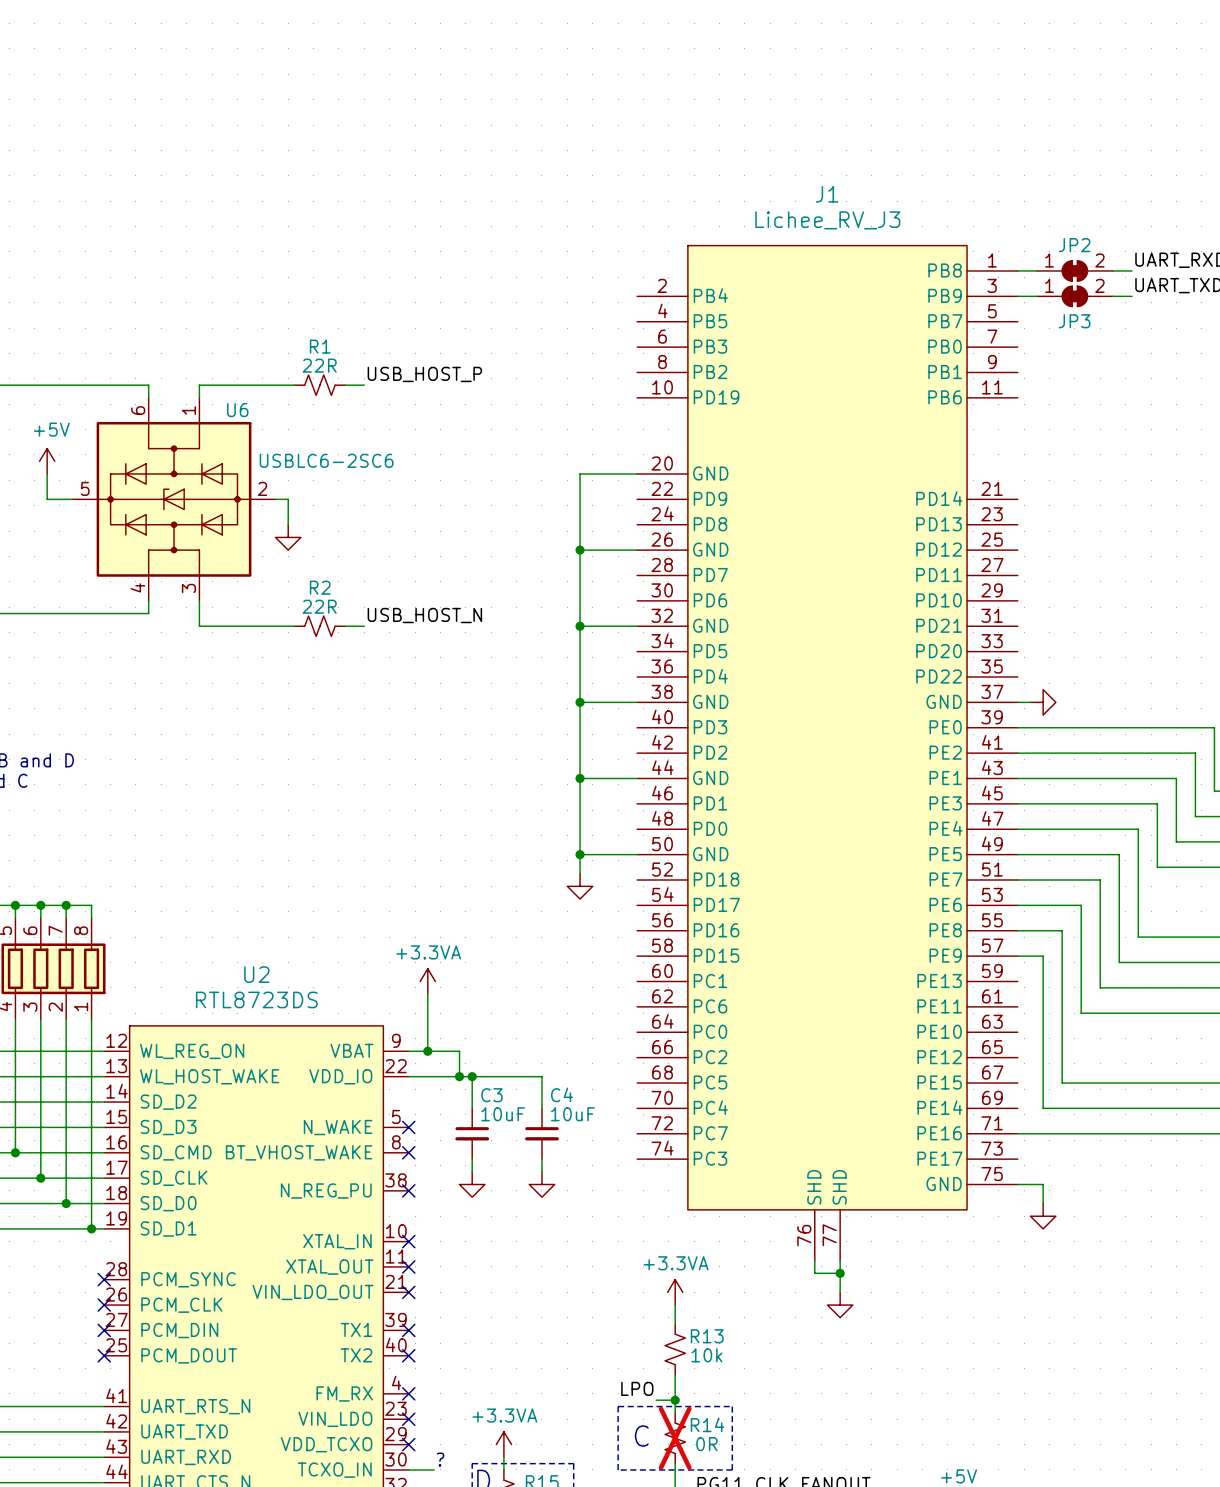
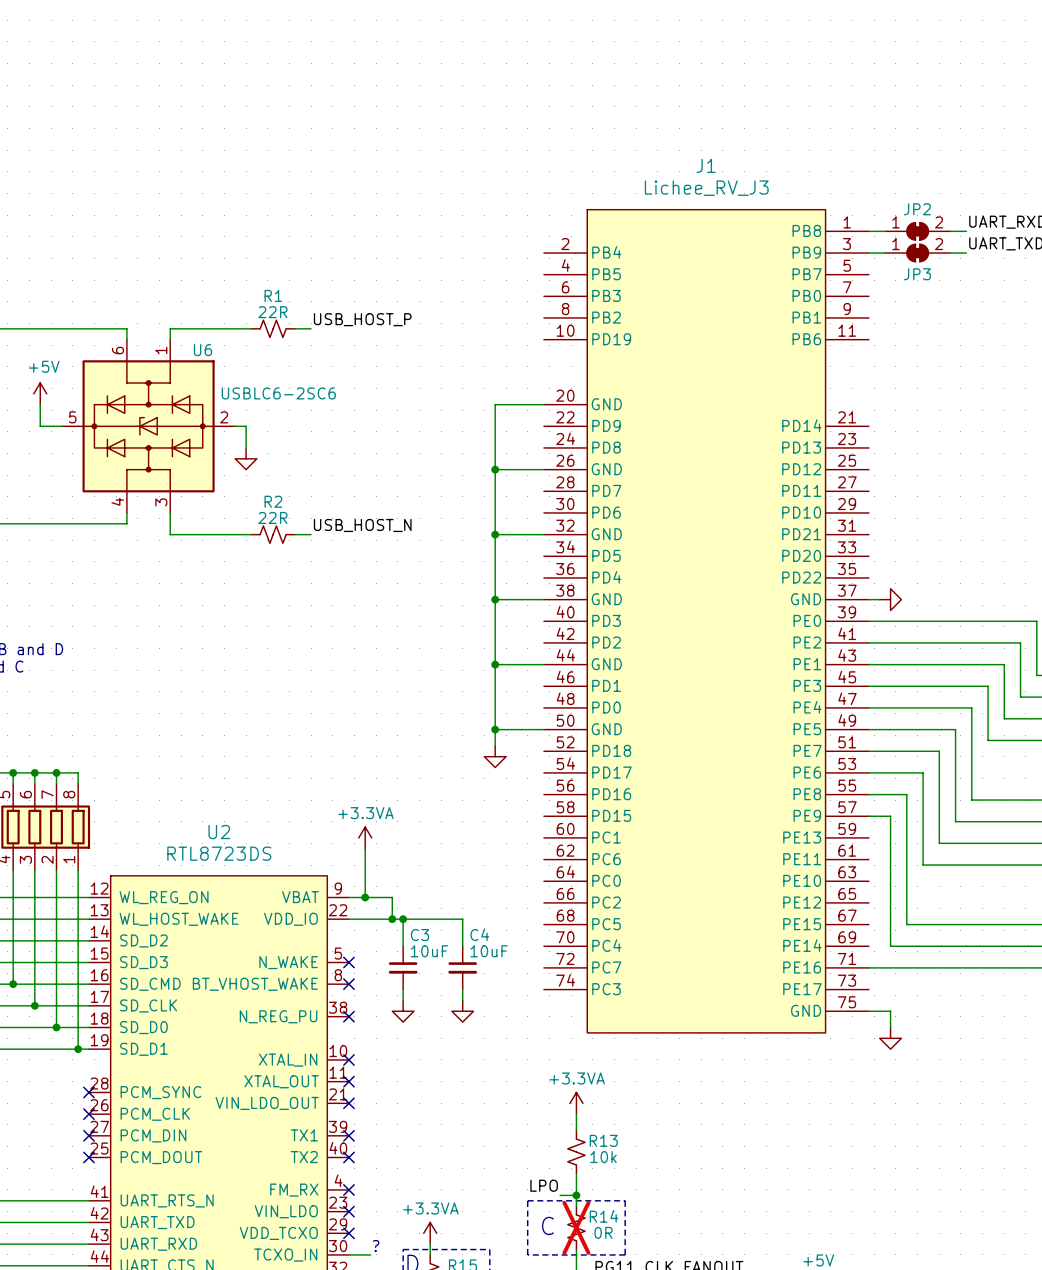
J1 symbol: [637, 245, 1018, 1261] -> [543, 209, 869, 1033]
wire: (814, 1260) (814, 1273) (840, 1273) -> none
wire: (840, 1260) (840, 1292) -> none
junction: (840, 1273) -> none
power symbol: (840, 1305) -> none

